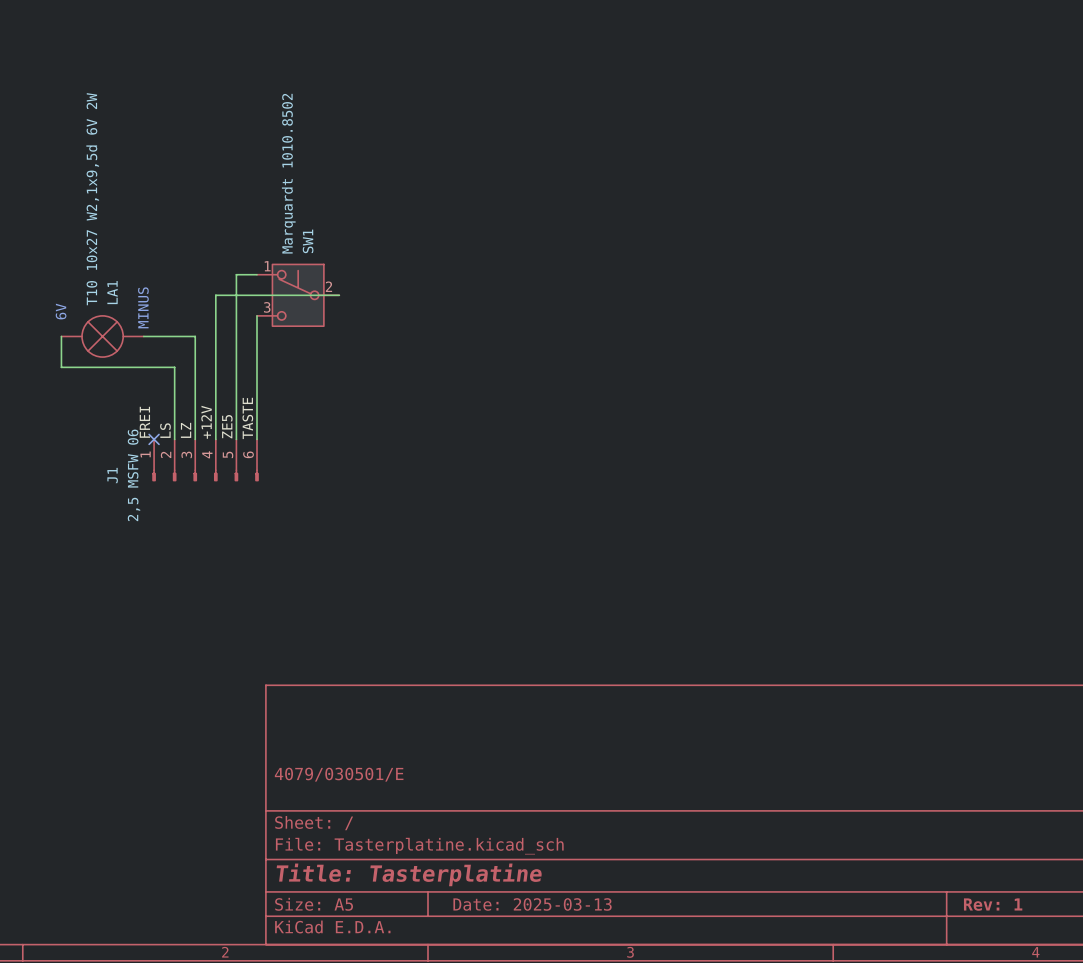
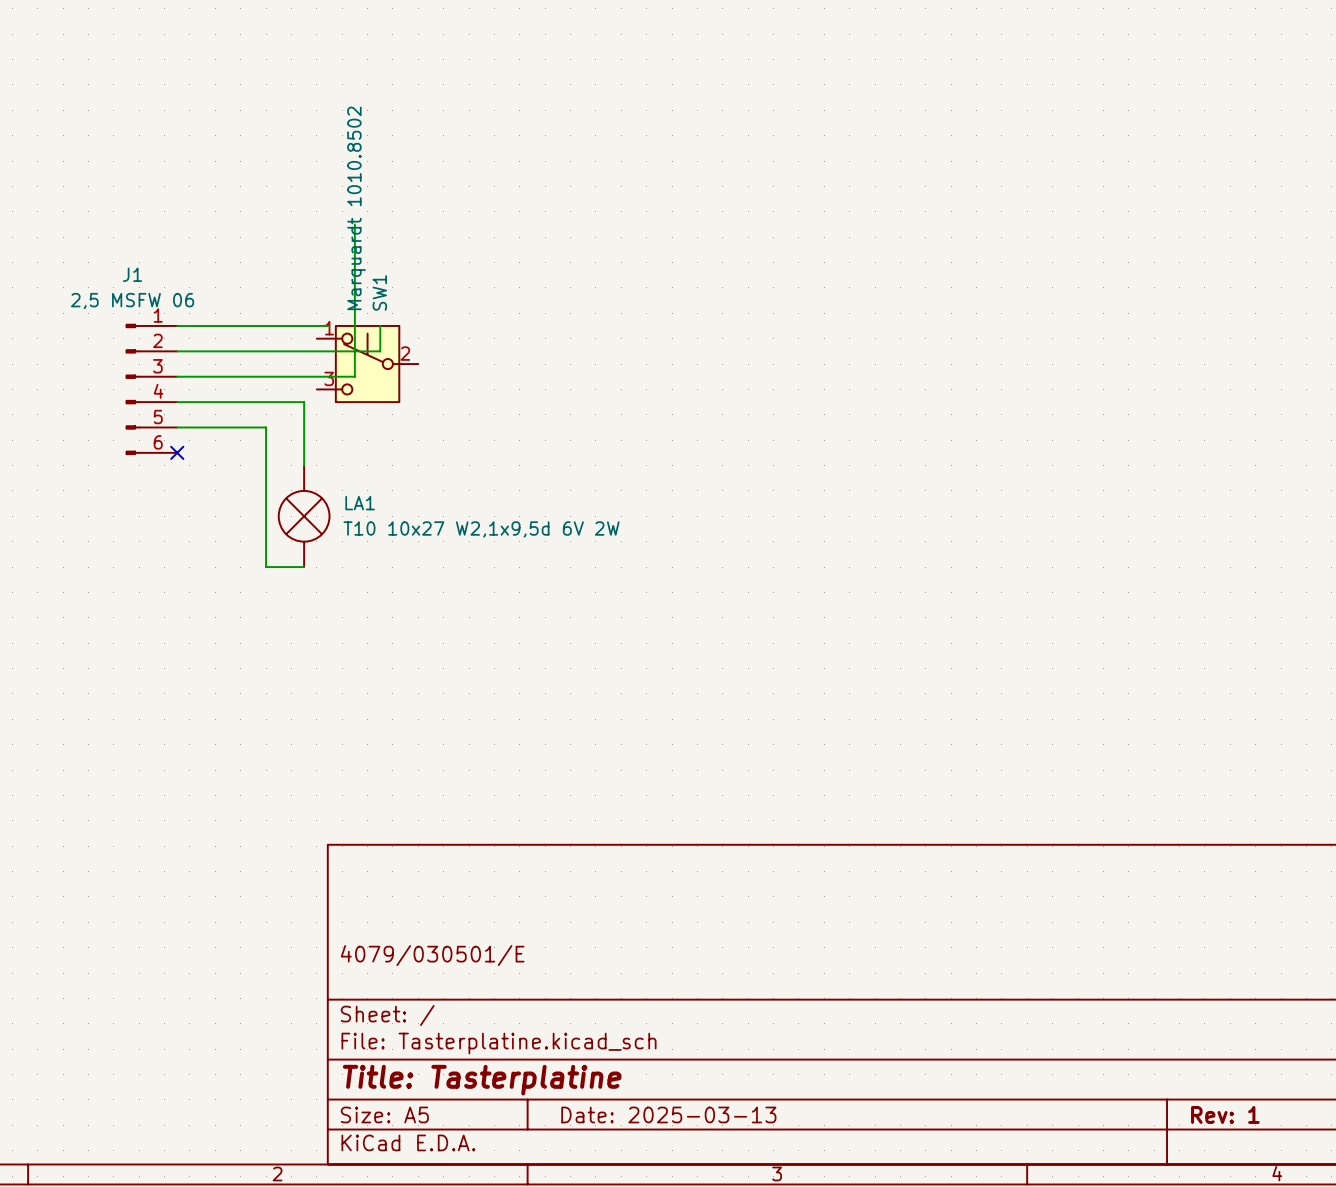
wire: none -> (354, 224) (354, 376) (177, 376)
LA1 value position: T10 10x27 W2,1x9,5d 6V 2W (92, 199) -> T10 10x27 W2,1x9,5d 6V 2W (481, 529)
wire: none -> (177, 325) (329, 325)
wire: none -> (380, 325) (380, 351) (177, 351)
wire: (256, 274) (236, 274) (236, 439) -> none
LA1 name position: LA1 (112, 292) -> LA1 (360, 503)
wire: (339, 295) (215, 295) (215, 346) -> (177, 427) (266, 427)
text: MINUS (143, 307) -> none
text: 6V (61, 311) -> none
wire: (256, 315) (256, 439) -> none
wire: none -> (177, 402) (304, 402) (304, 465)
wire: (61, 336) (61, 367) (174, 367) (174, 439) -> none
LA1 rotation: 0° (102, 336) -> 90° clockwise (304, 516)
LA1 position: (102, 336) -> (304, 516)
wire: (143, 336) (195, 336) (195, 439) -> none
no-connect mark: none -> (177, 452)
label: TASTE (247, 418) -> none
label: FREI (144, 422) -> none
label: +12V (206, 422) -> none
label: ZE5 (227, 426) -> none
label: LS (165, 430) -> none
label: LZ (186, 430) -> none
no-connect mark: (154, 439) -> none
wire: none -> (266, 541) (266, 567) (304, 567)
J1 position: (205, 460) -> (151, 389)
J1 rotation: 0° (205, 475) -> 90° clockwise (132, 389)

